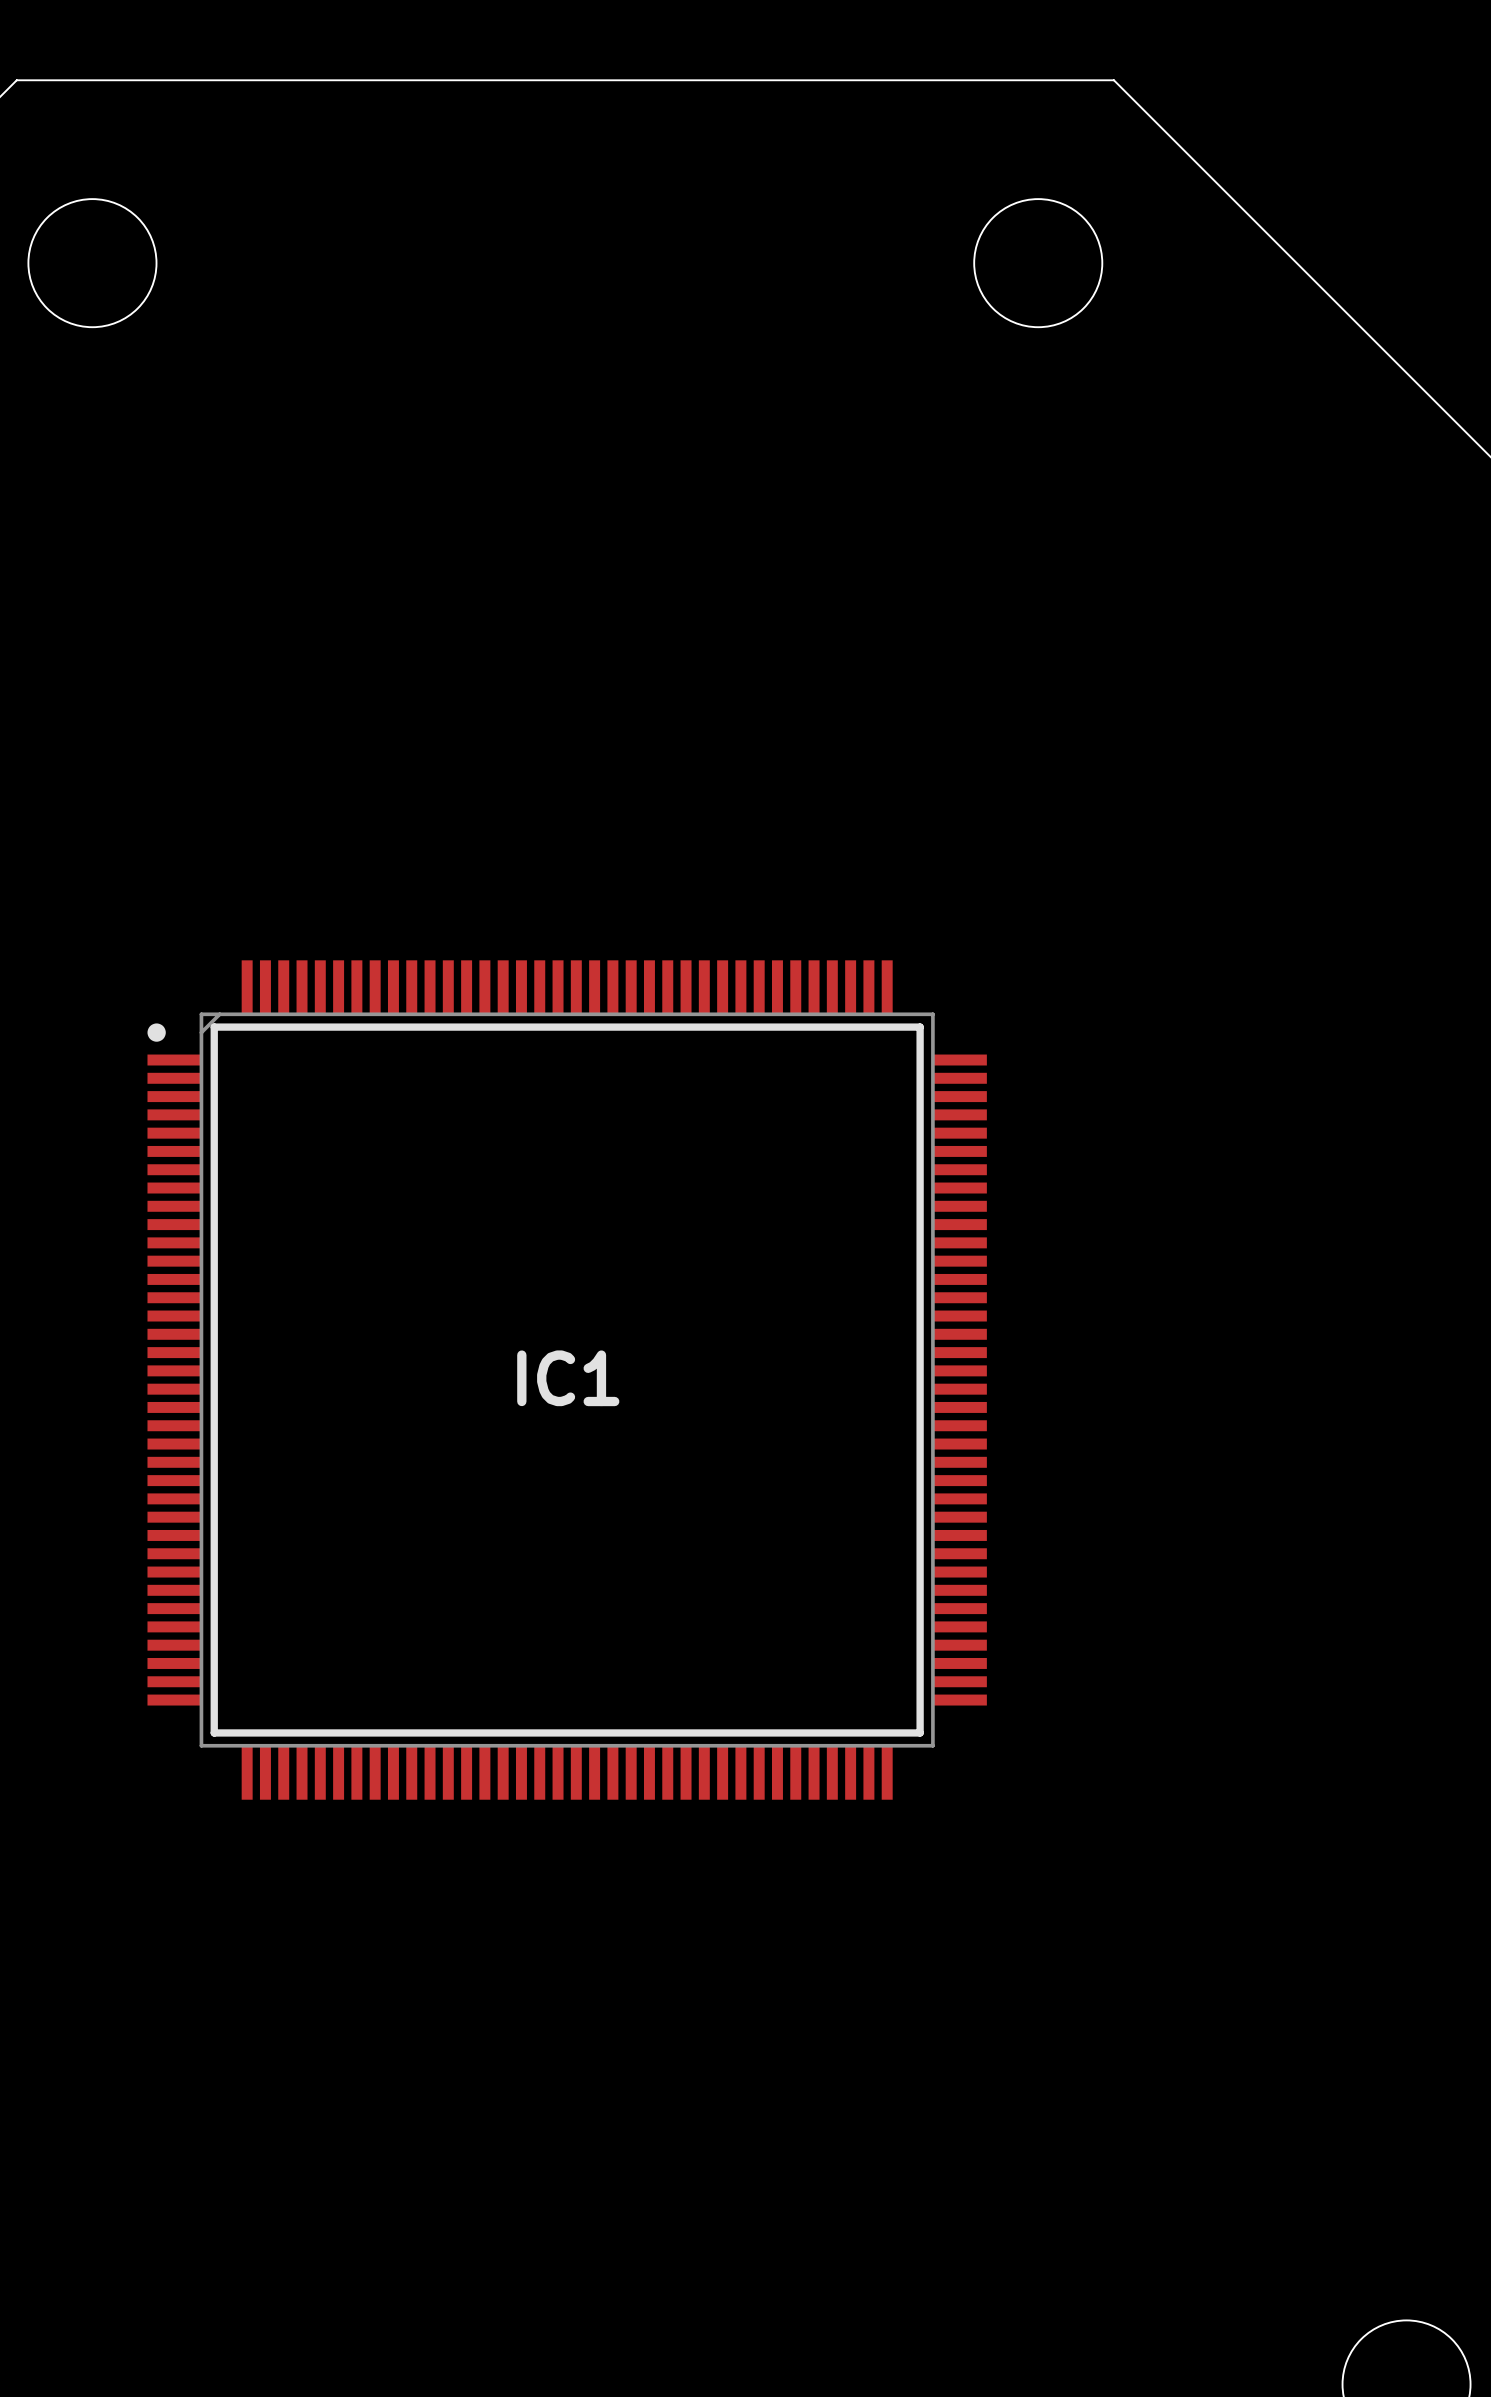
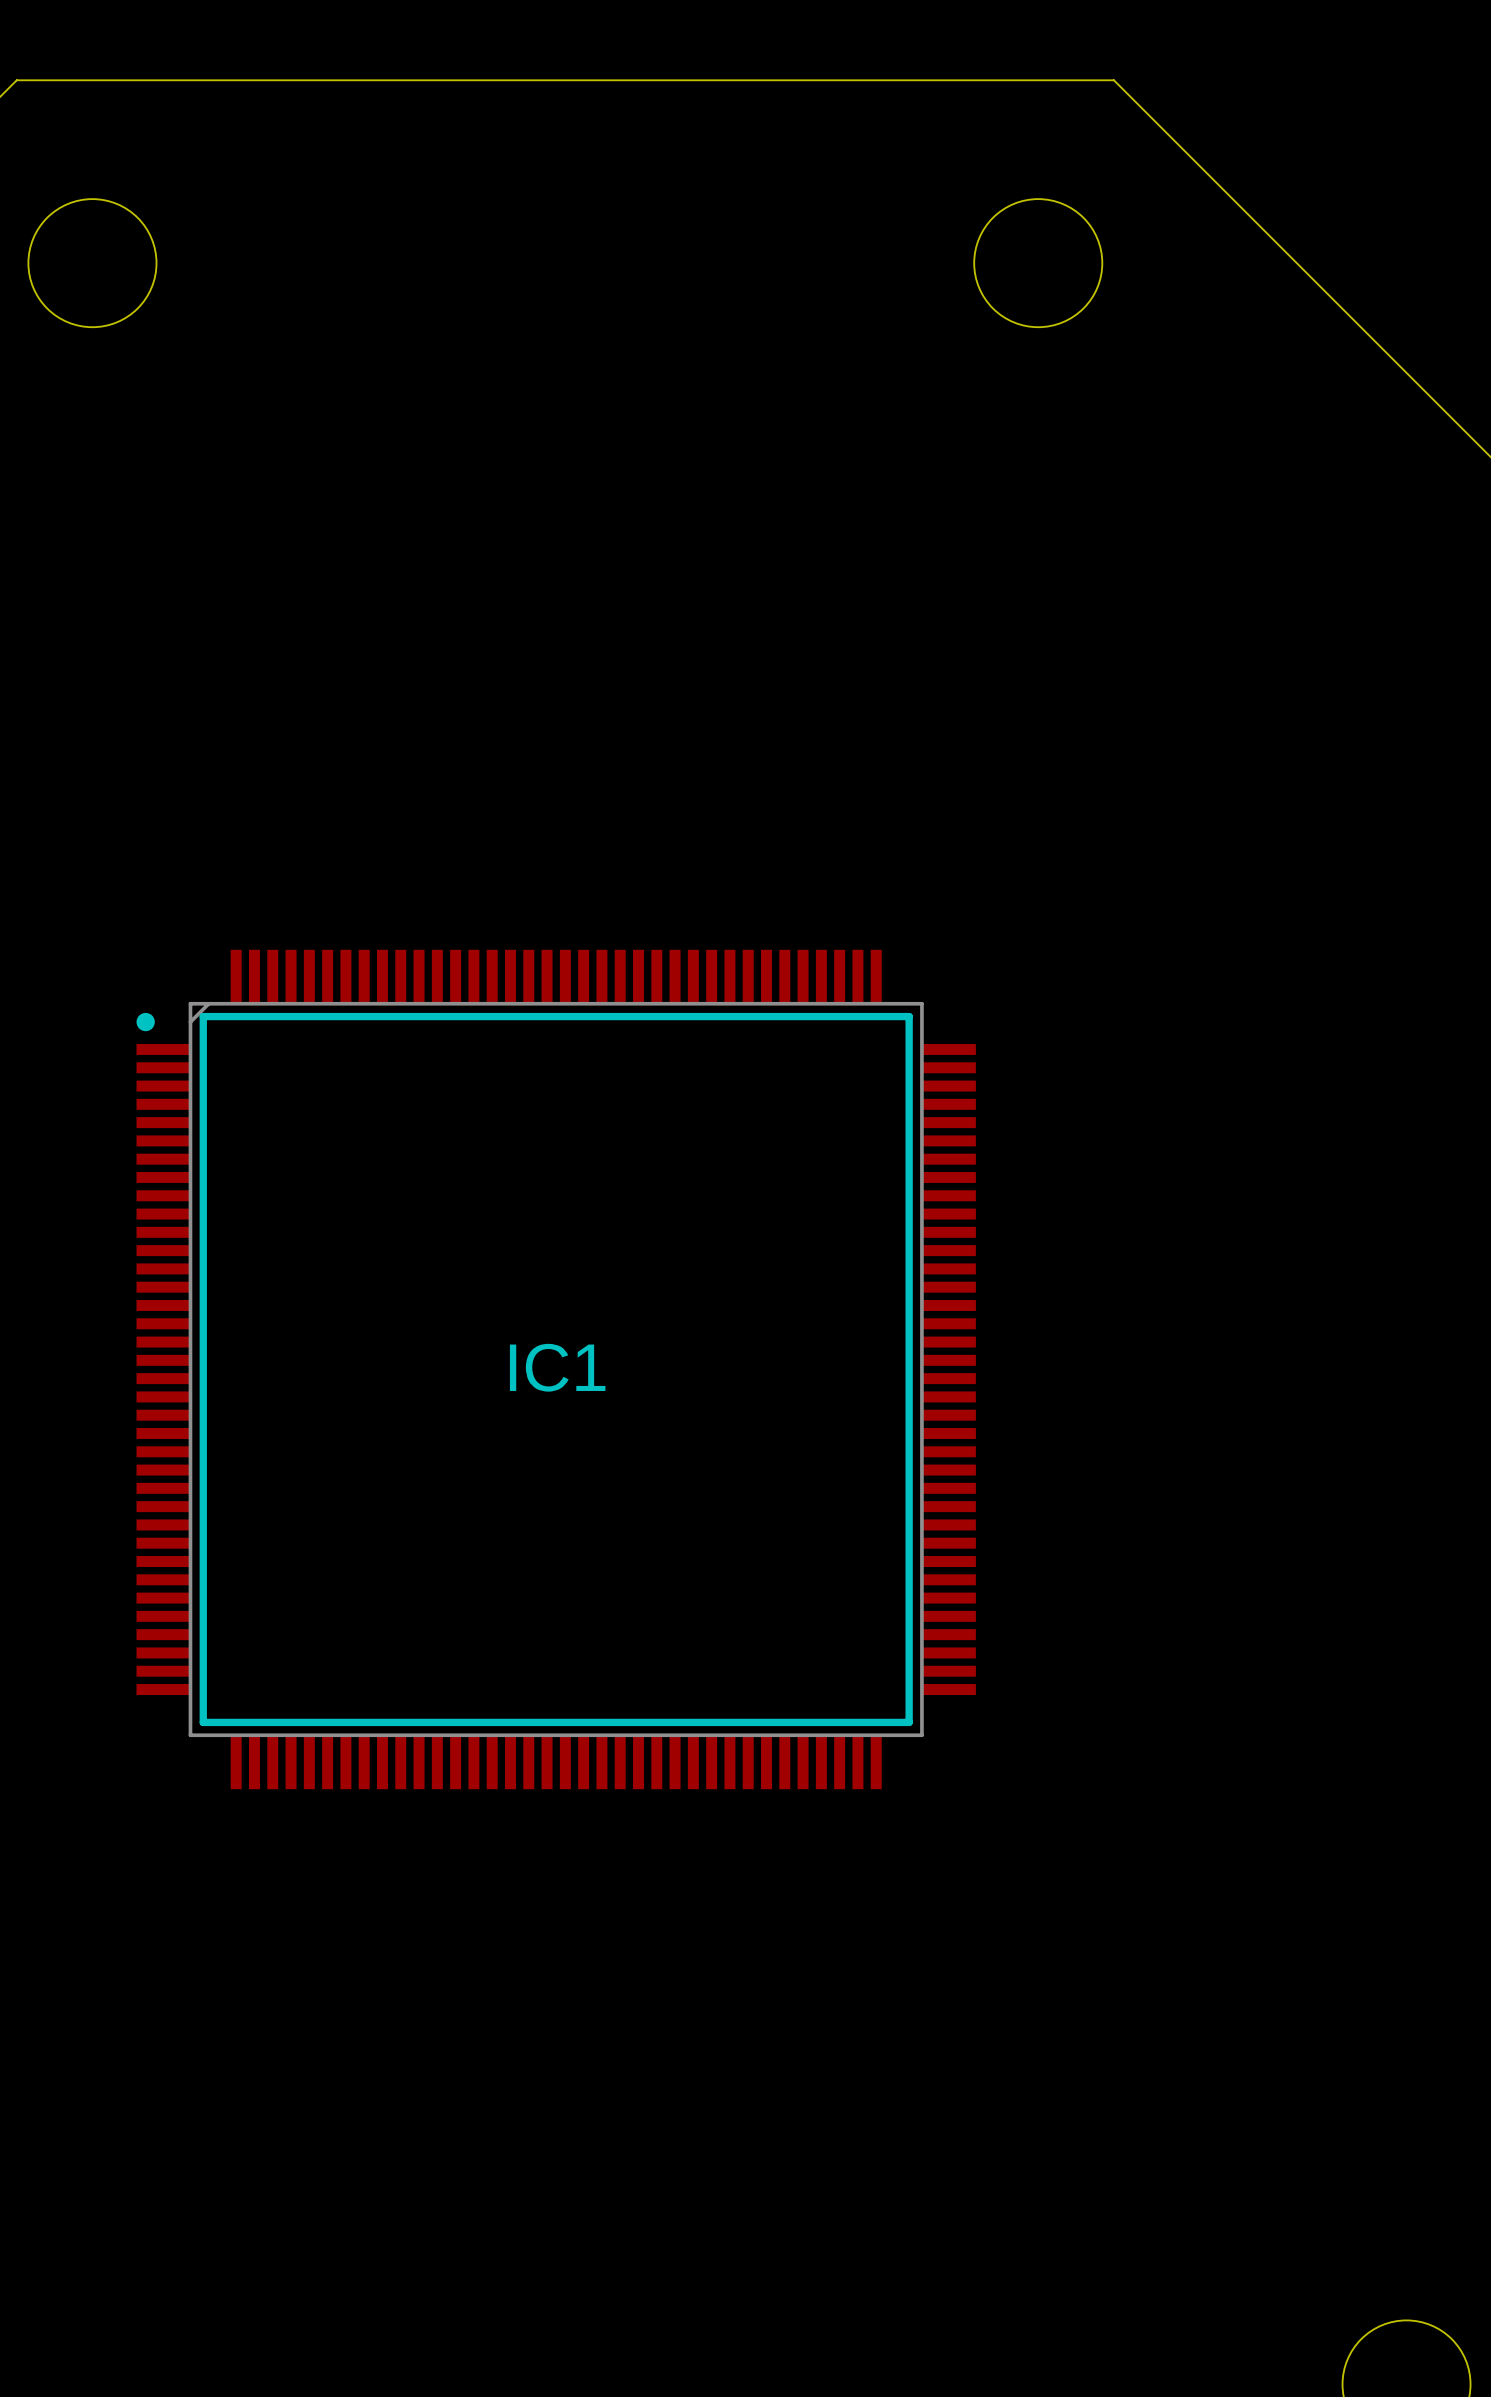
IC1 position: (567, 1380) -> (556, 1369)

